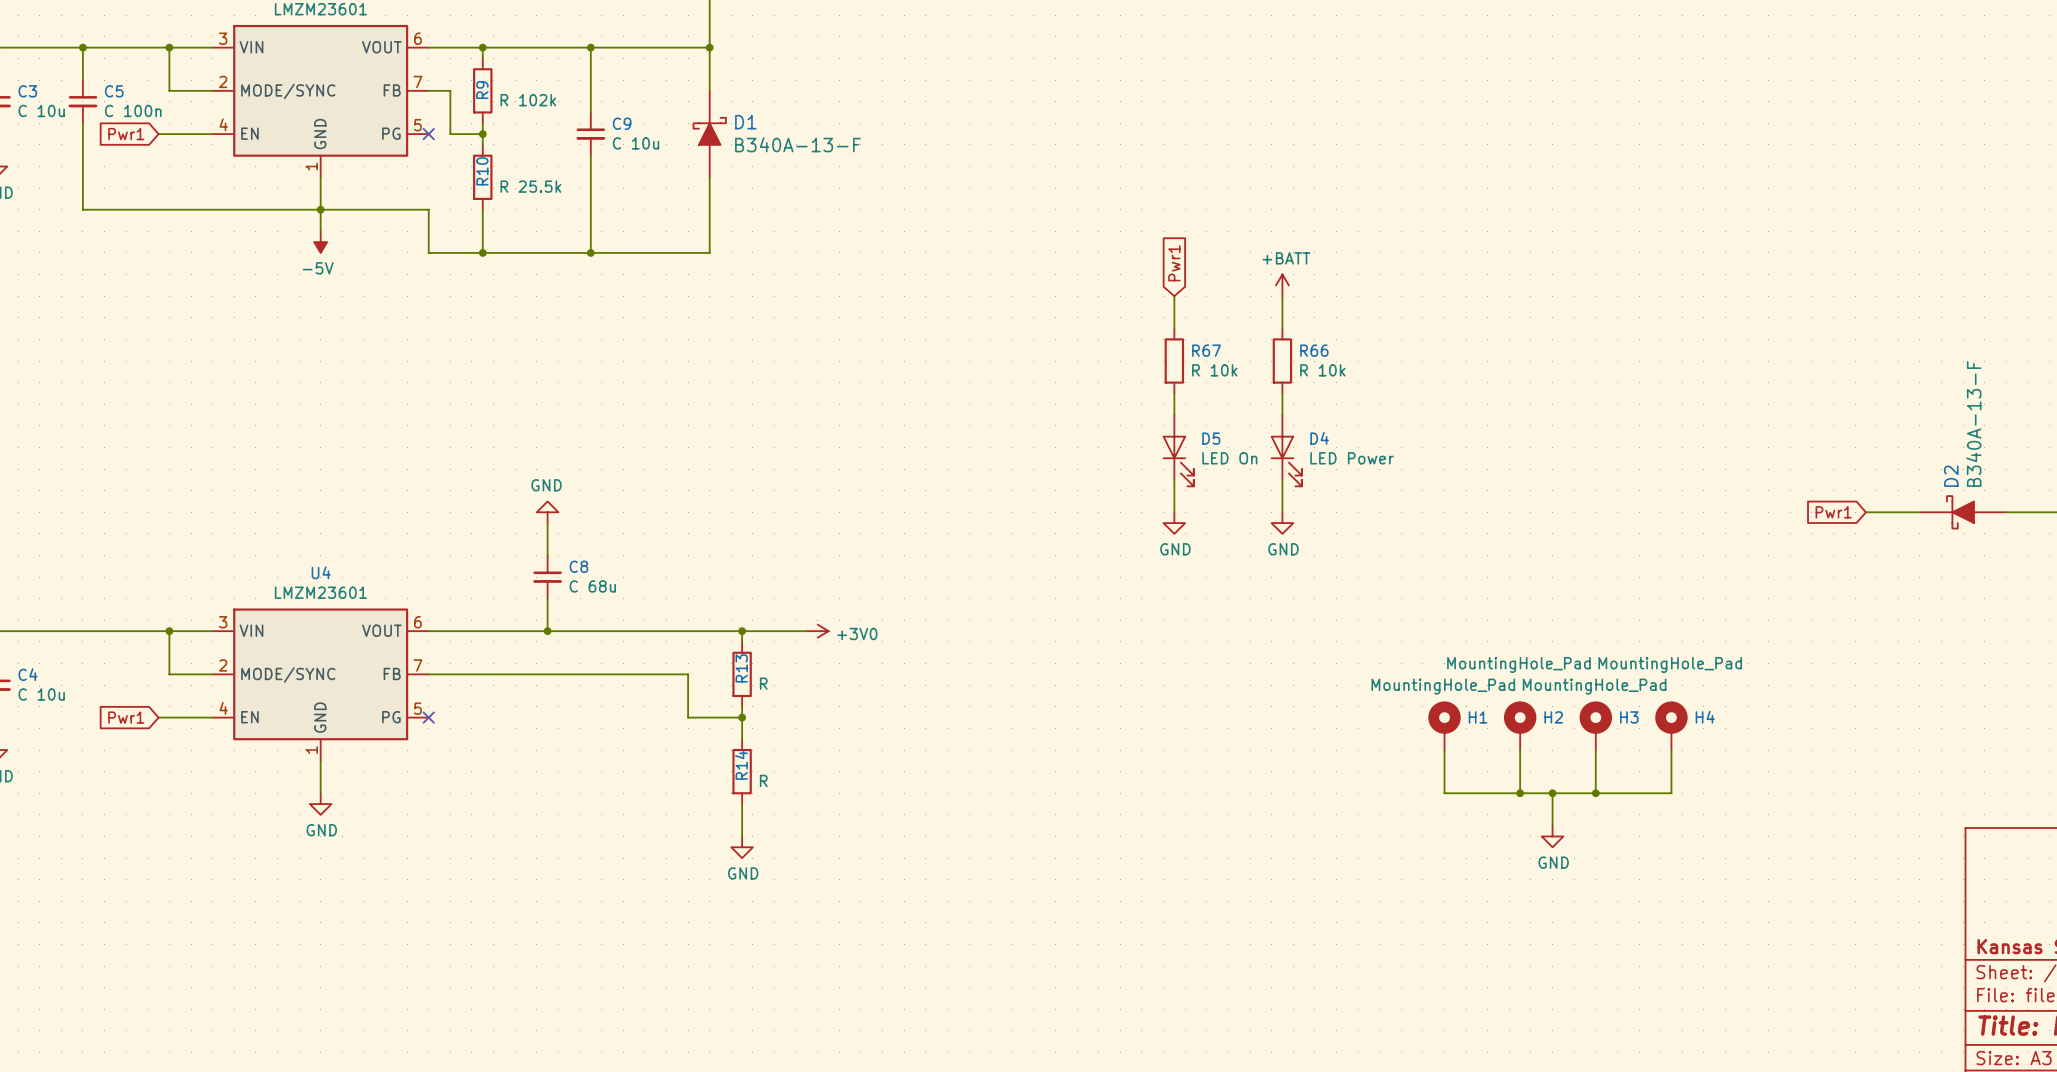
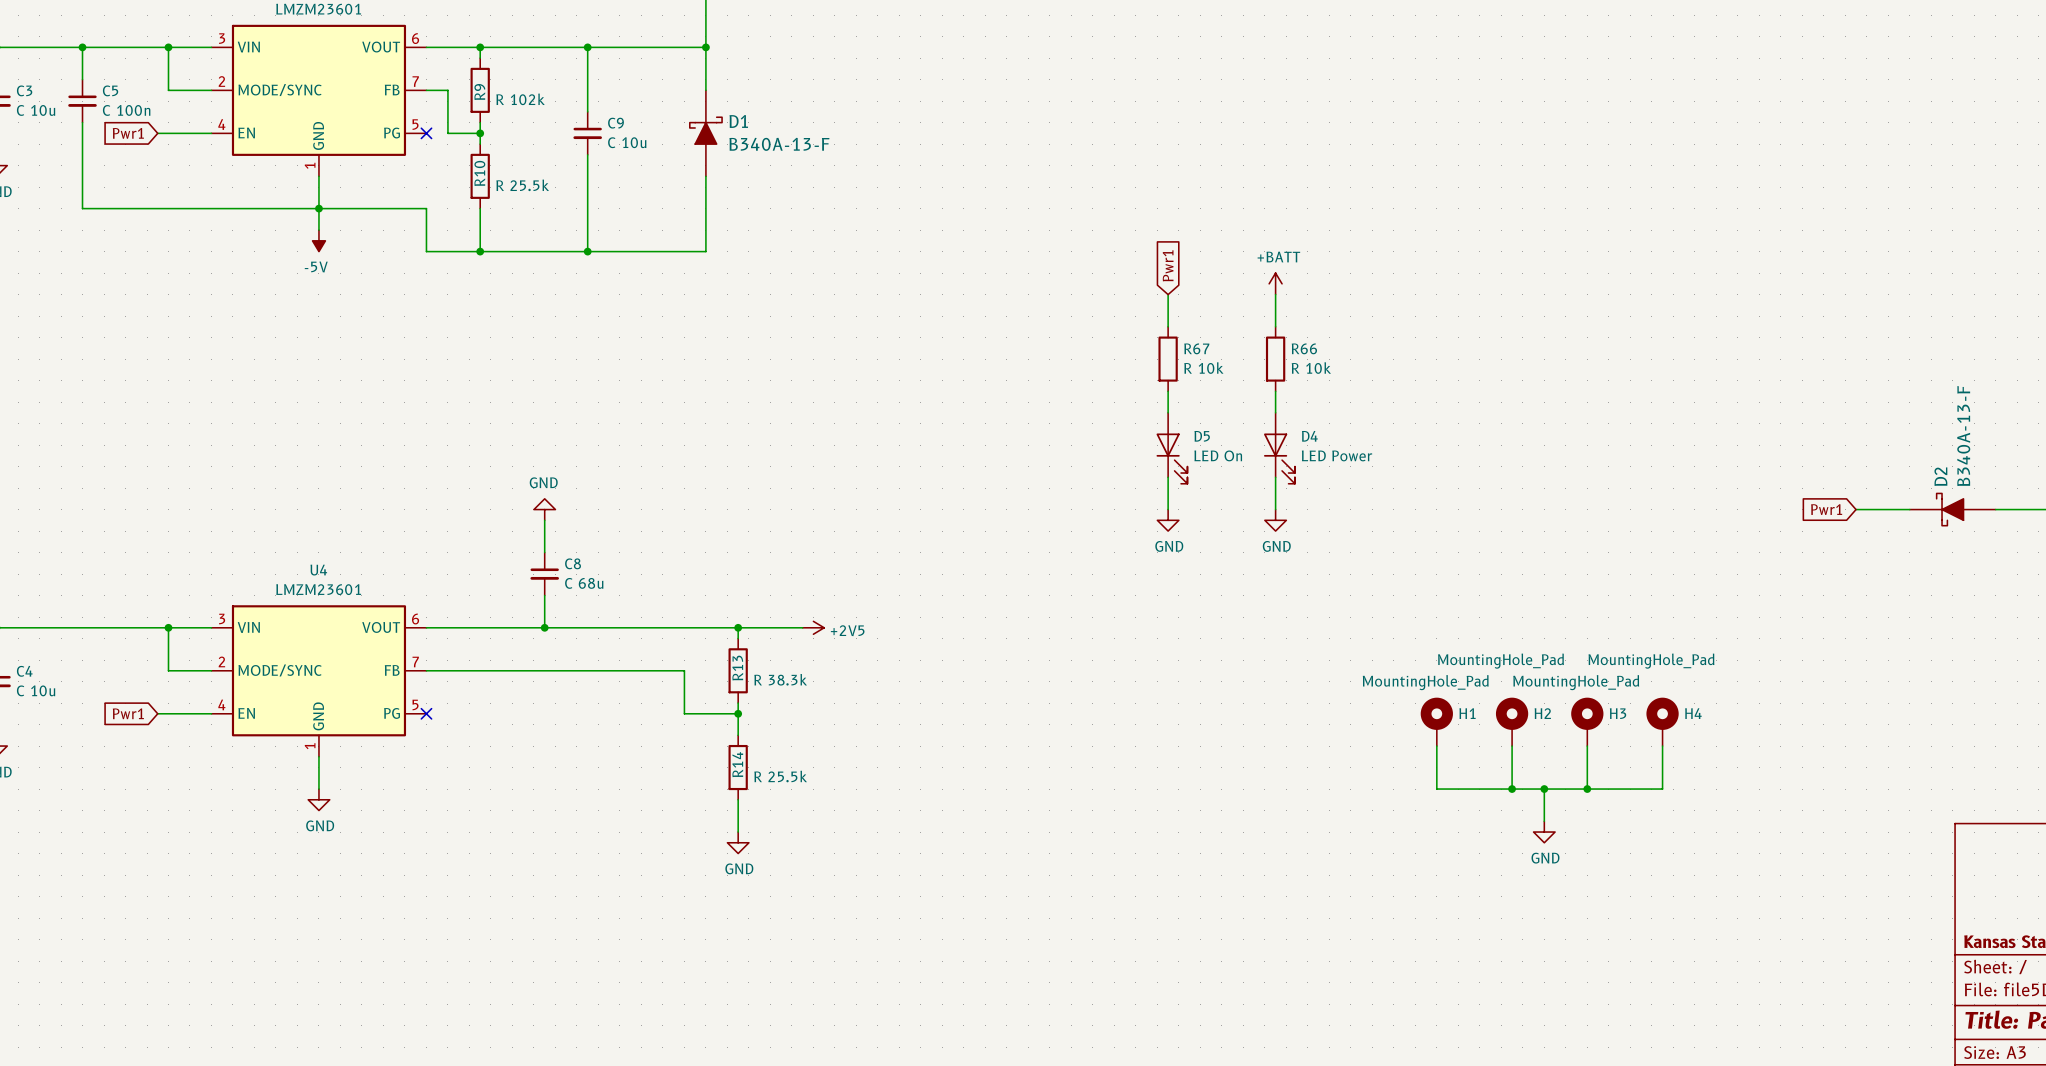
power symbol: +3V0 (817, 631) -> +2V5 (813, 627)
R13 value: R (763, 683) -> R 38.3k (780, 679)
R14 value: R (763, 780) -> R 25.5k (780, 776)

